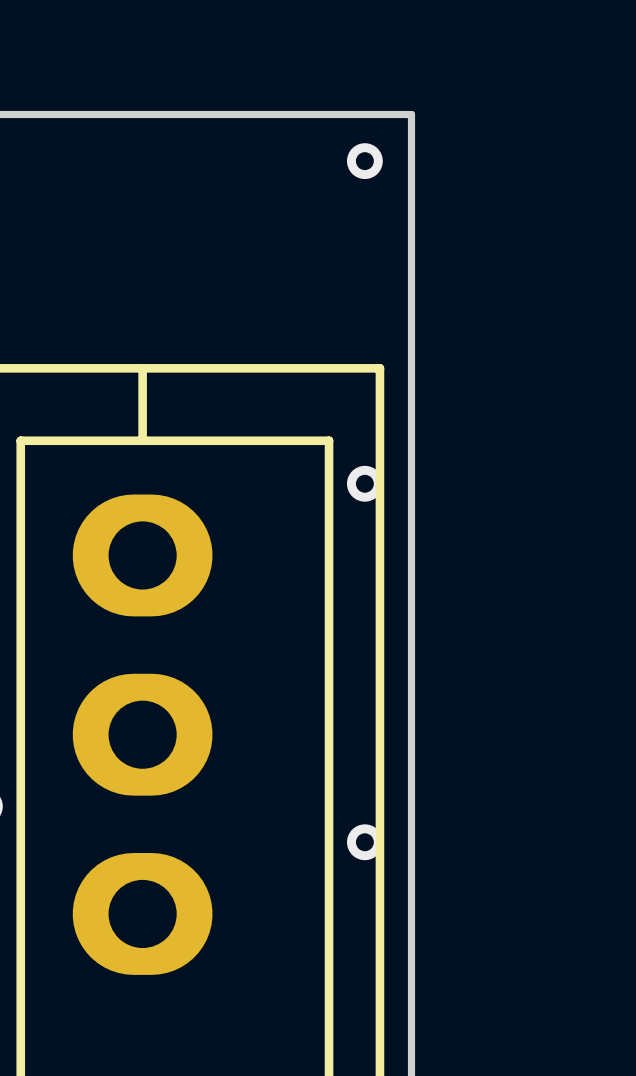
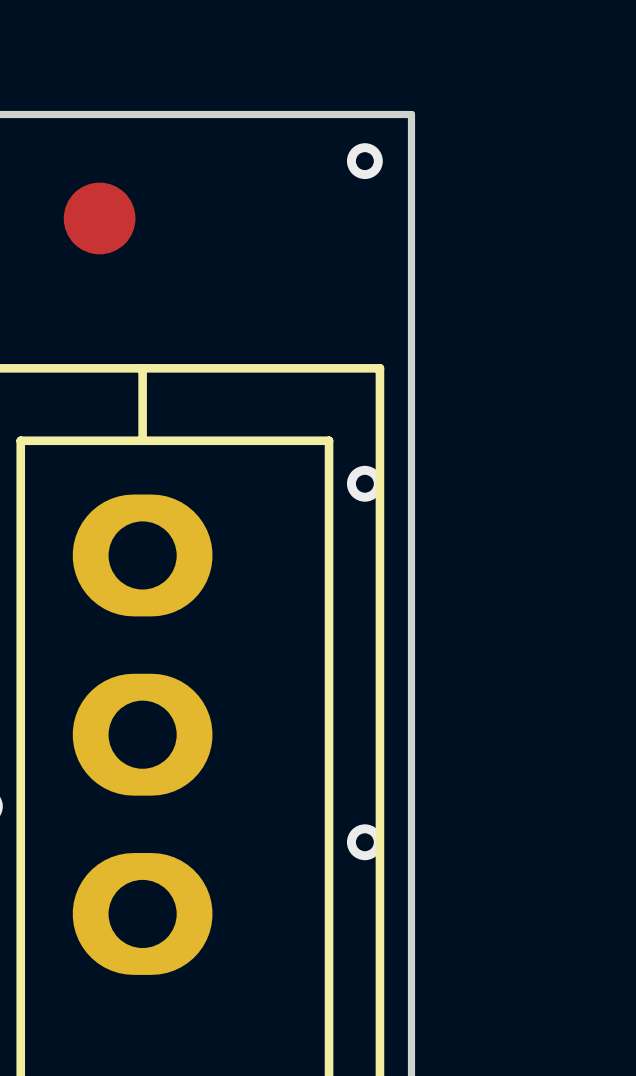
part: none -> (99, 218)

